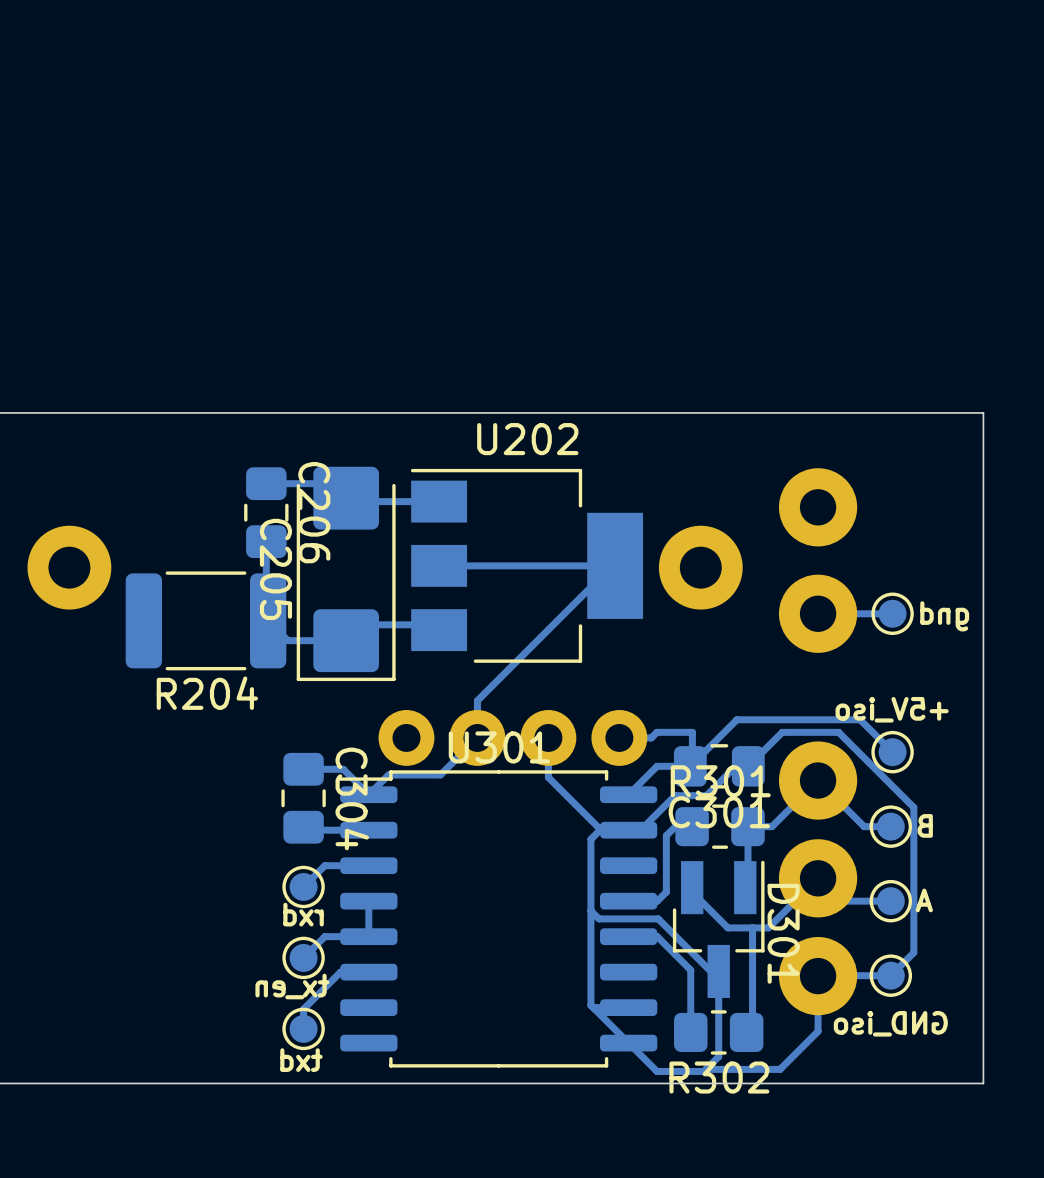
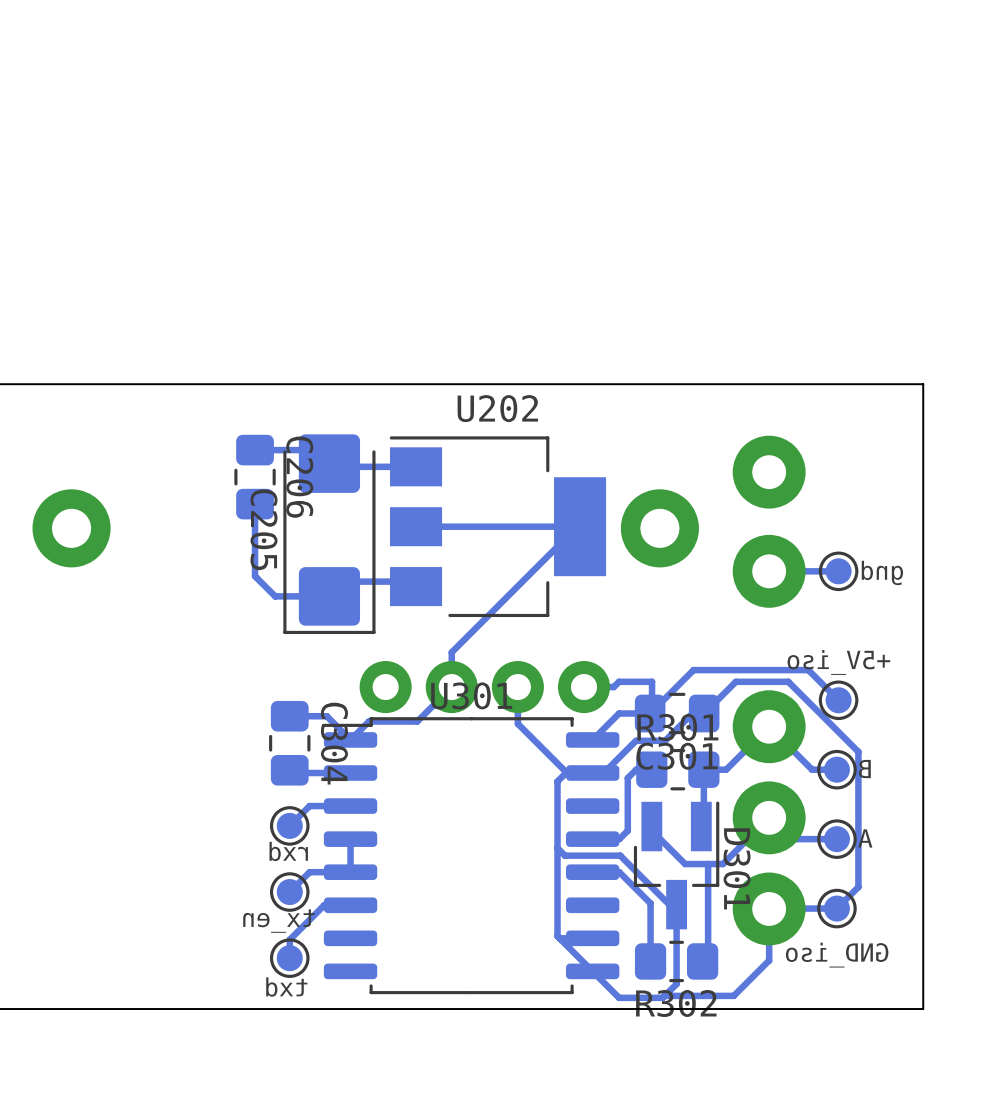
R204: (206, 620) -> none

